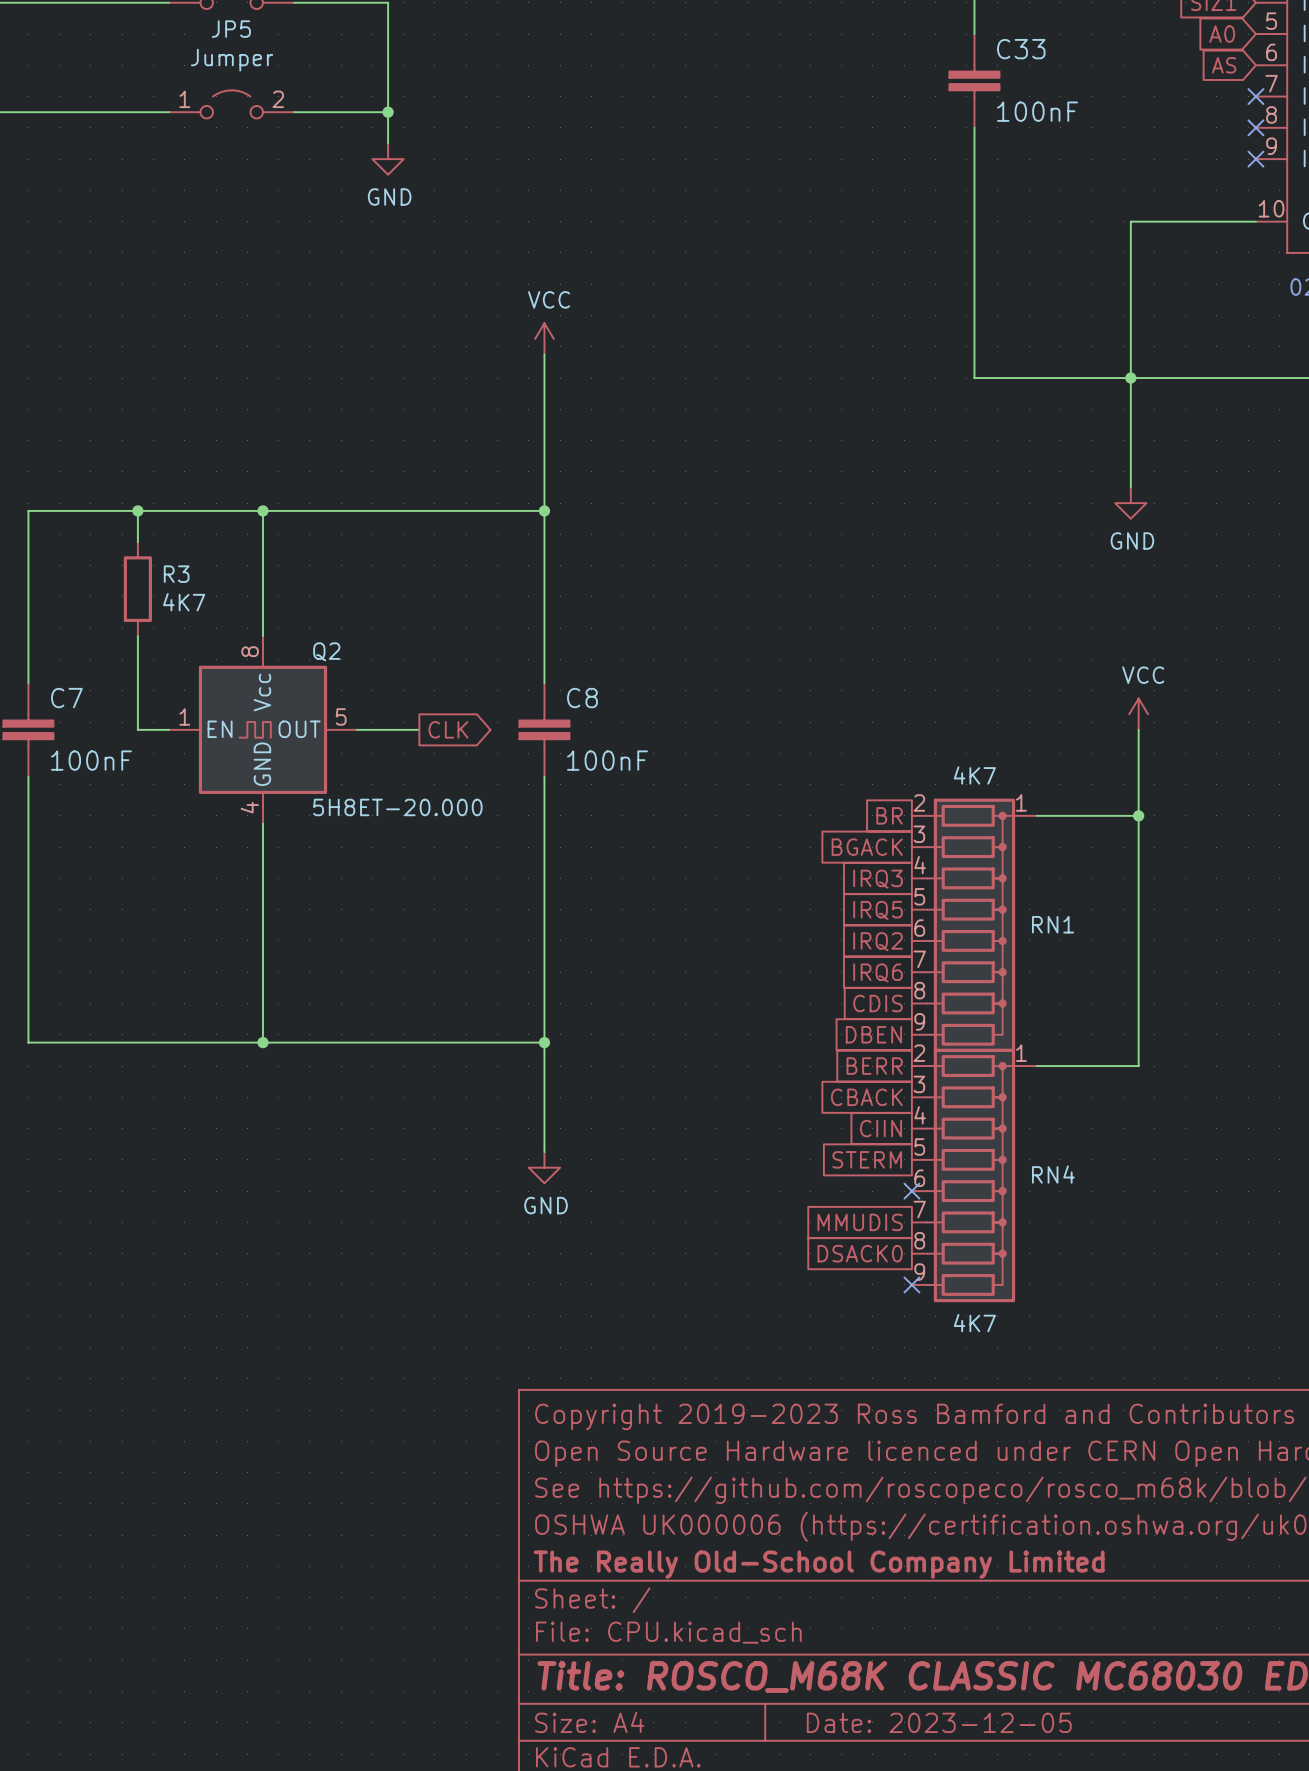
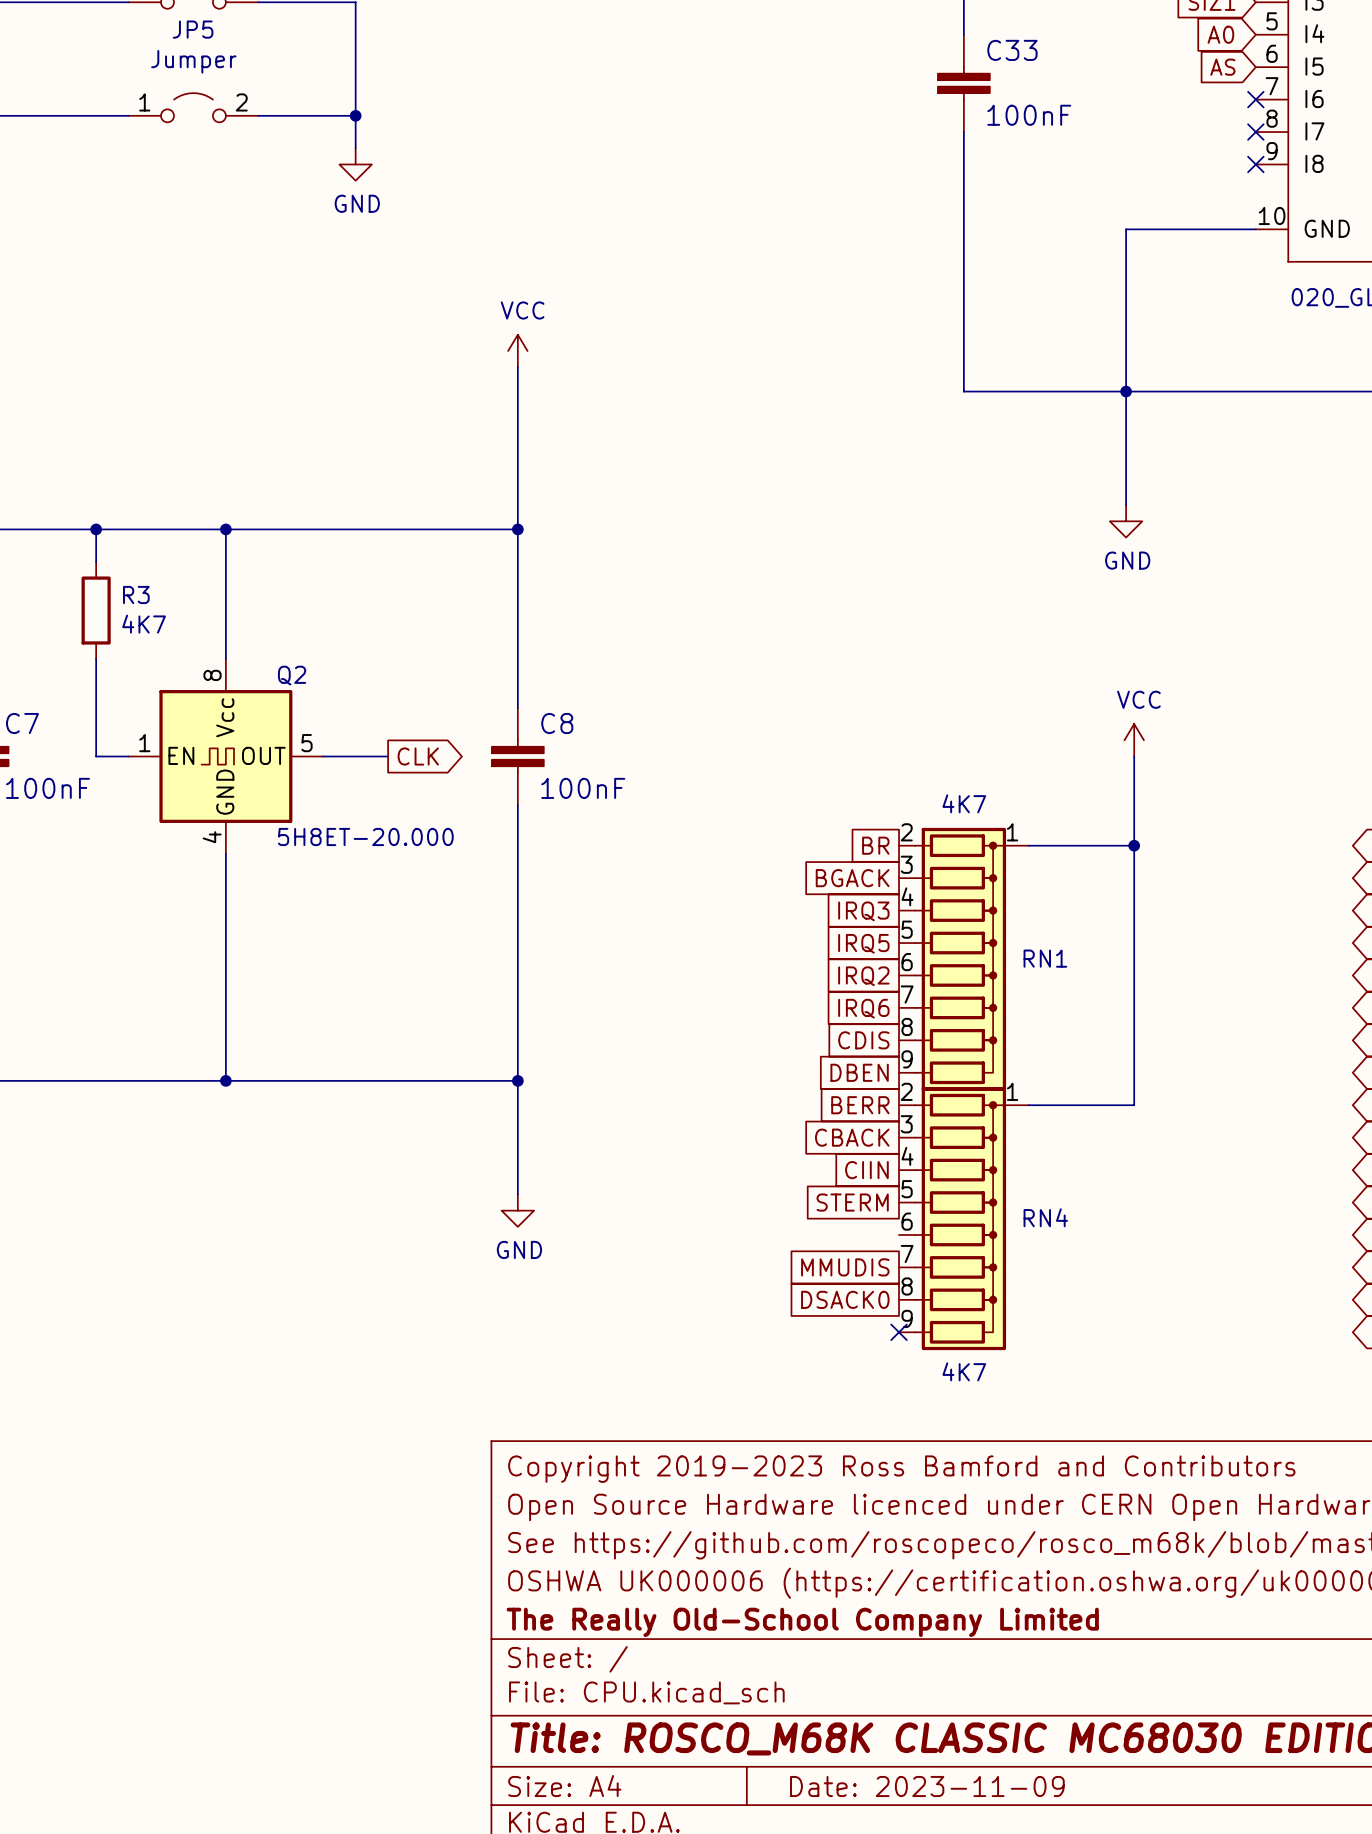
no-connect mark: (911, 1191) -> none
title block: Date: 2023-12-05 (939, 1722) -> Date: 2023-11-09 (927, 1786)

